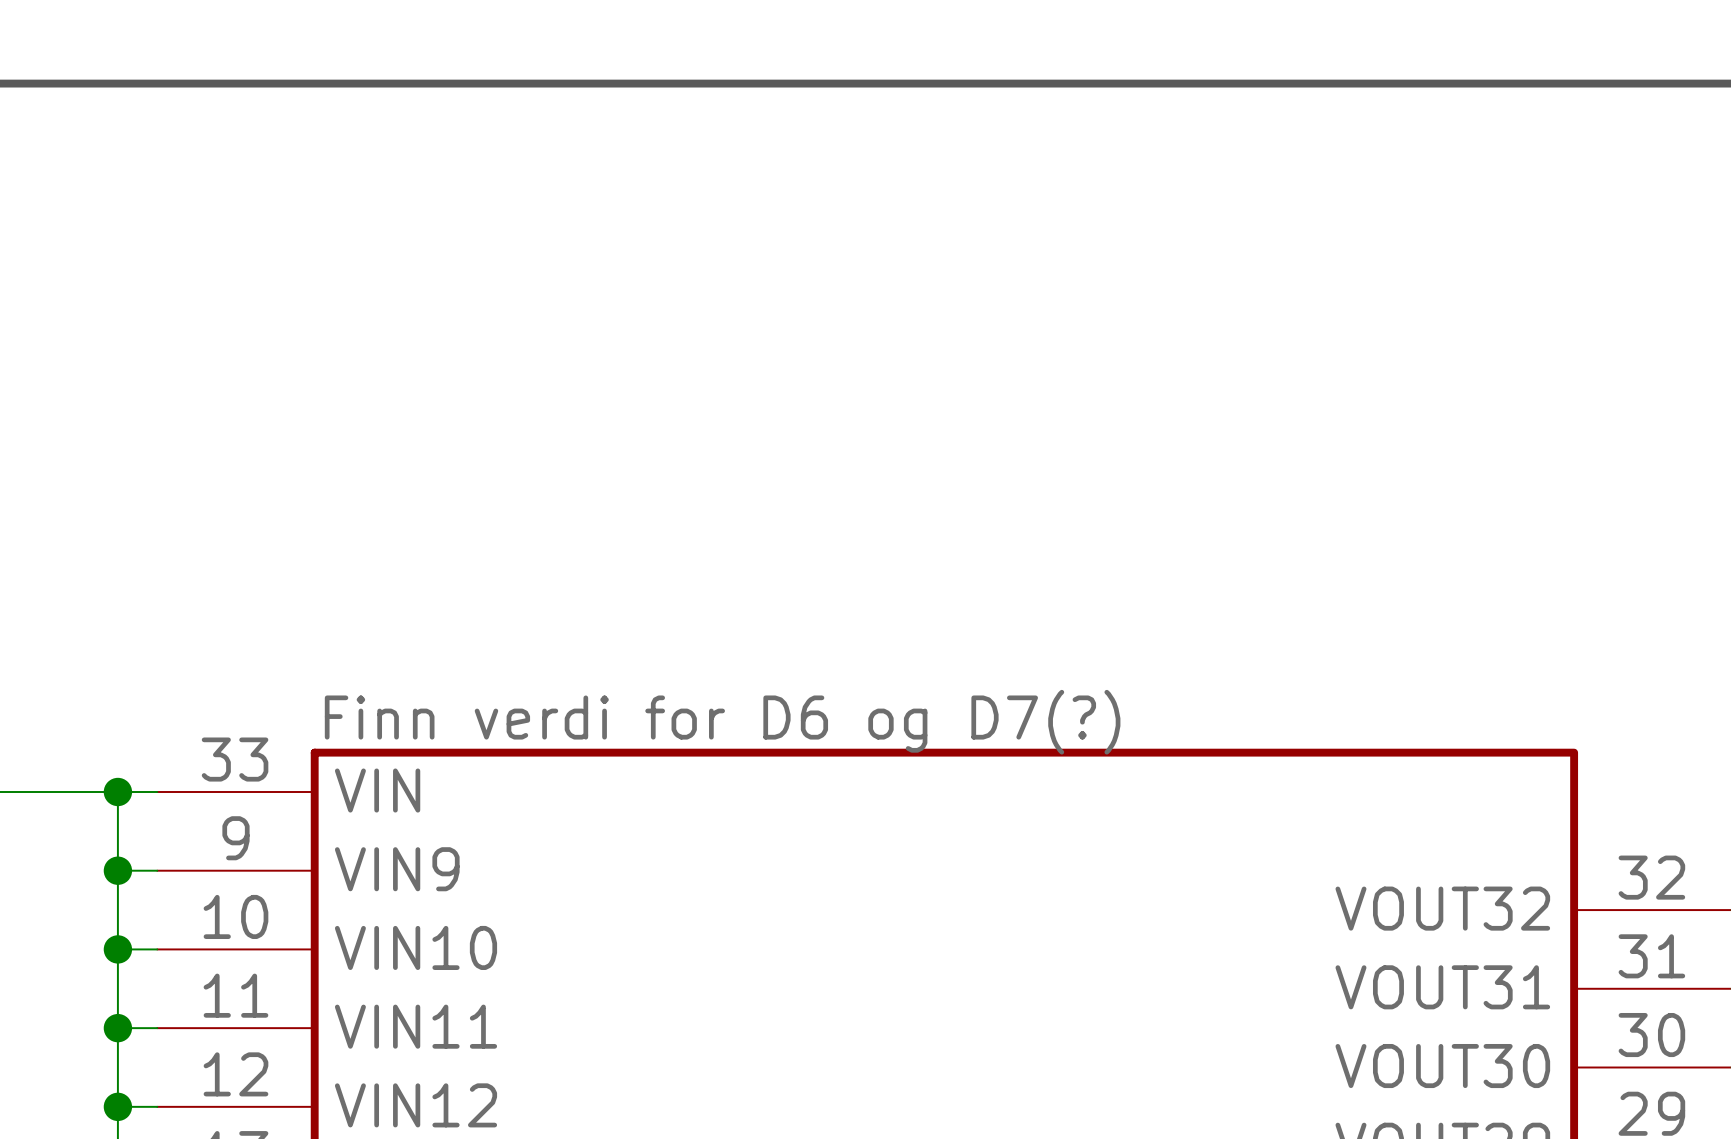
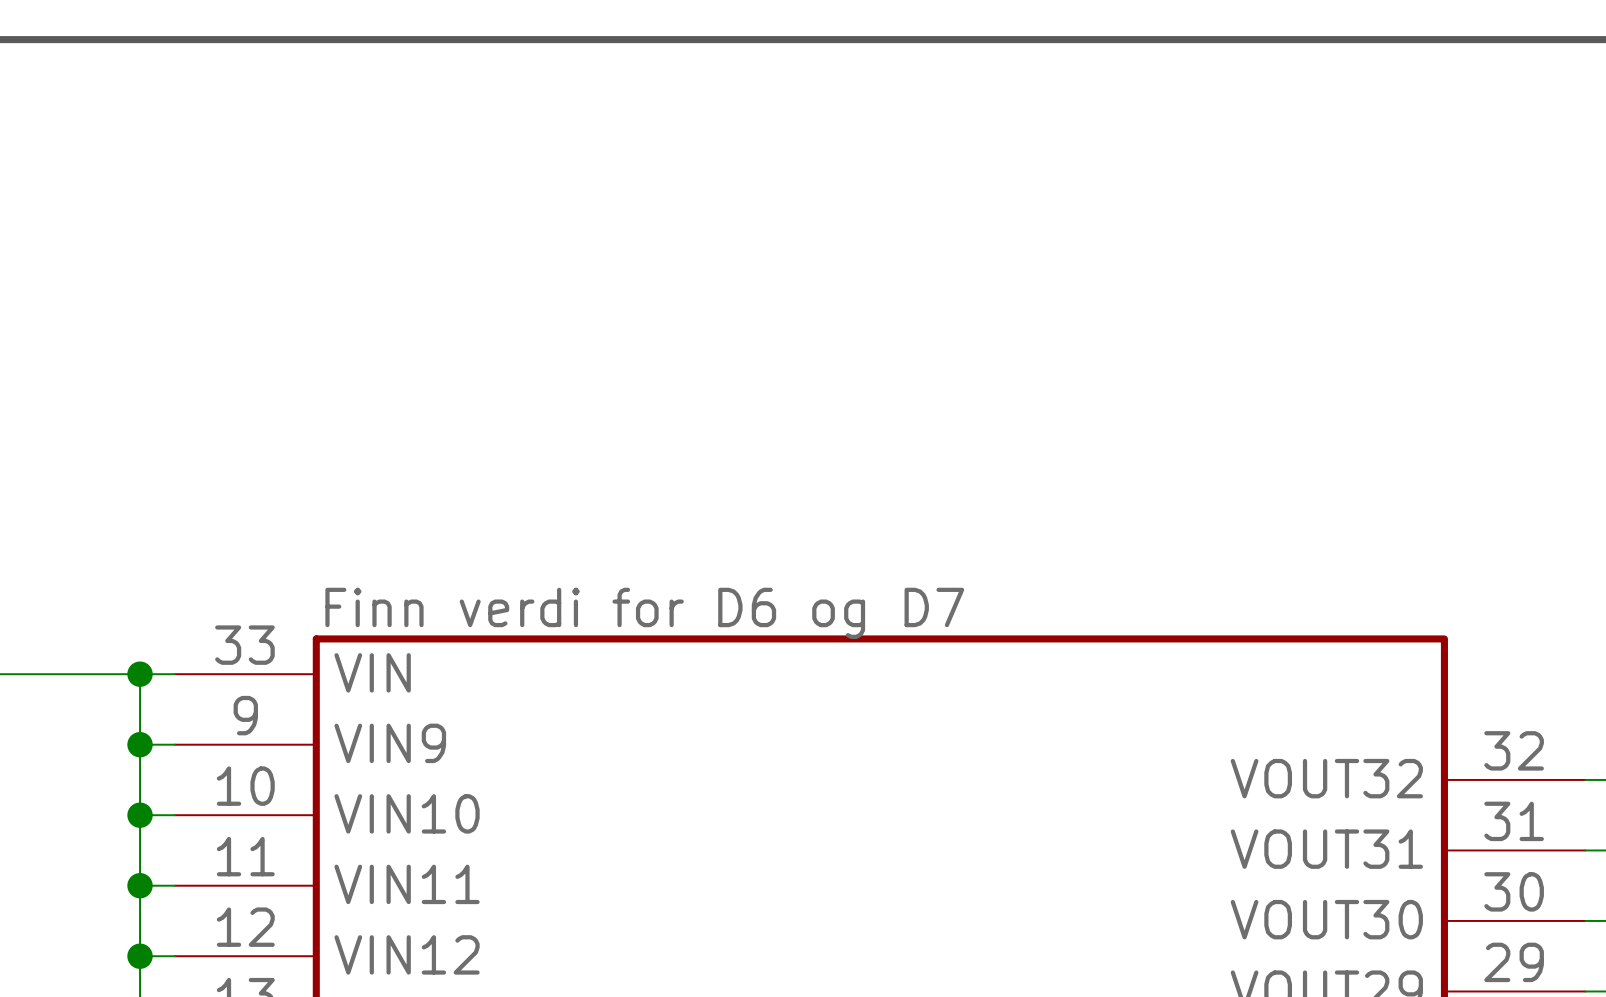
label: Finn verdi for D6 og D7(?) (722, 722) -> Finn verdi for D6 og D7 (644, 613)

